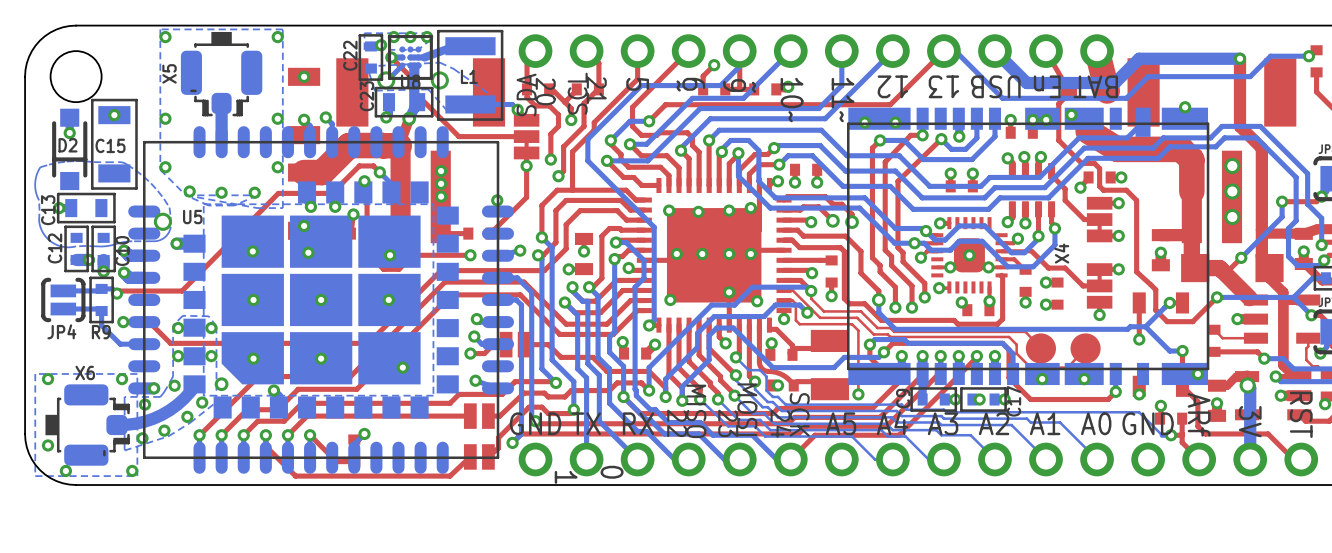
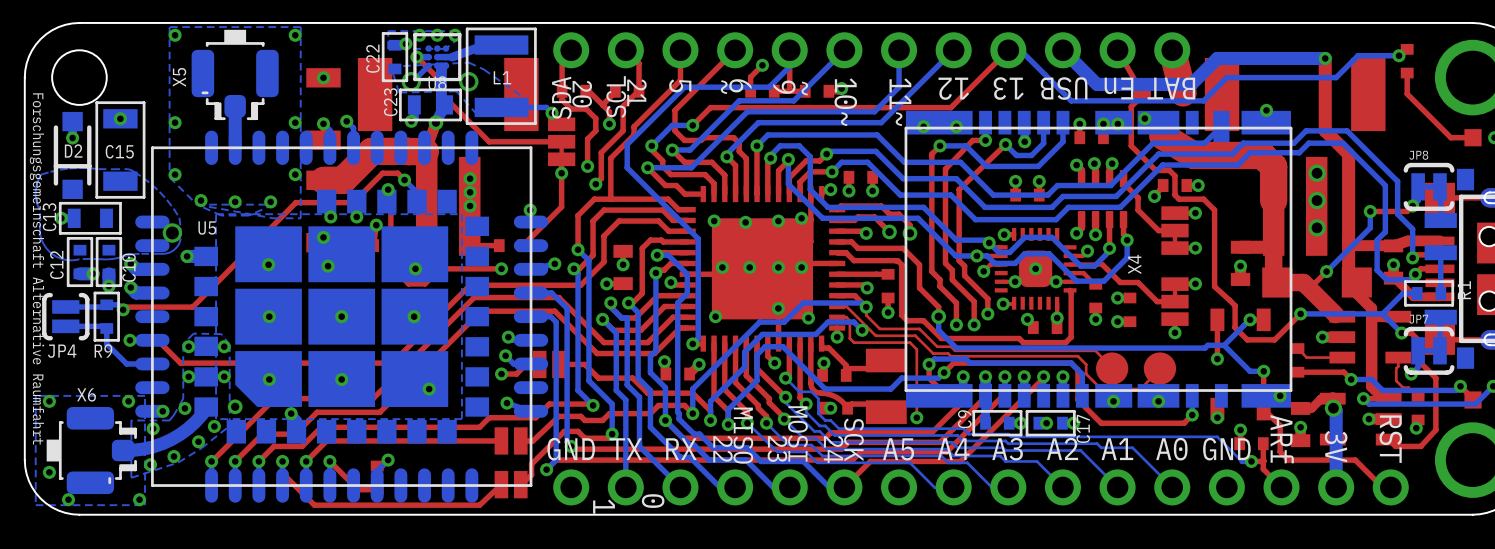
text: none -> Forschungsgemeinschaft Alternative Raumfahrt (36, 268)

